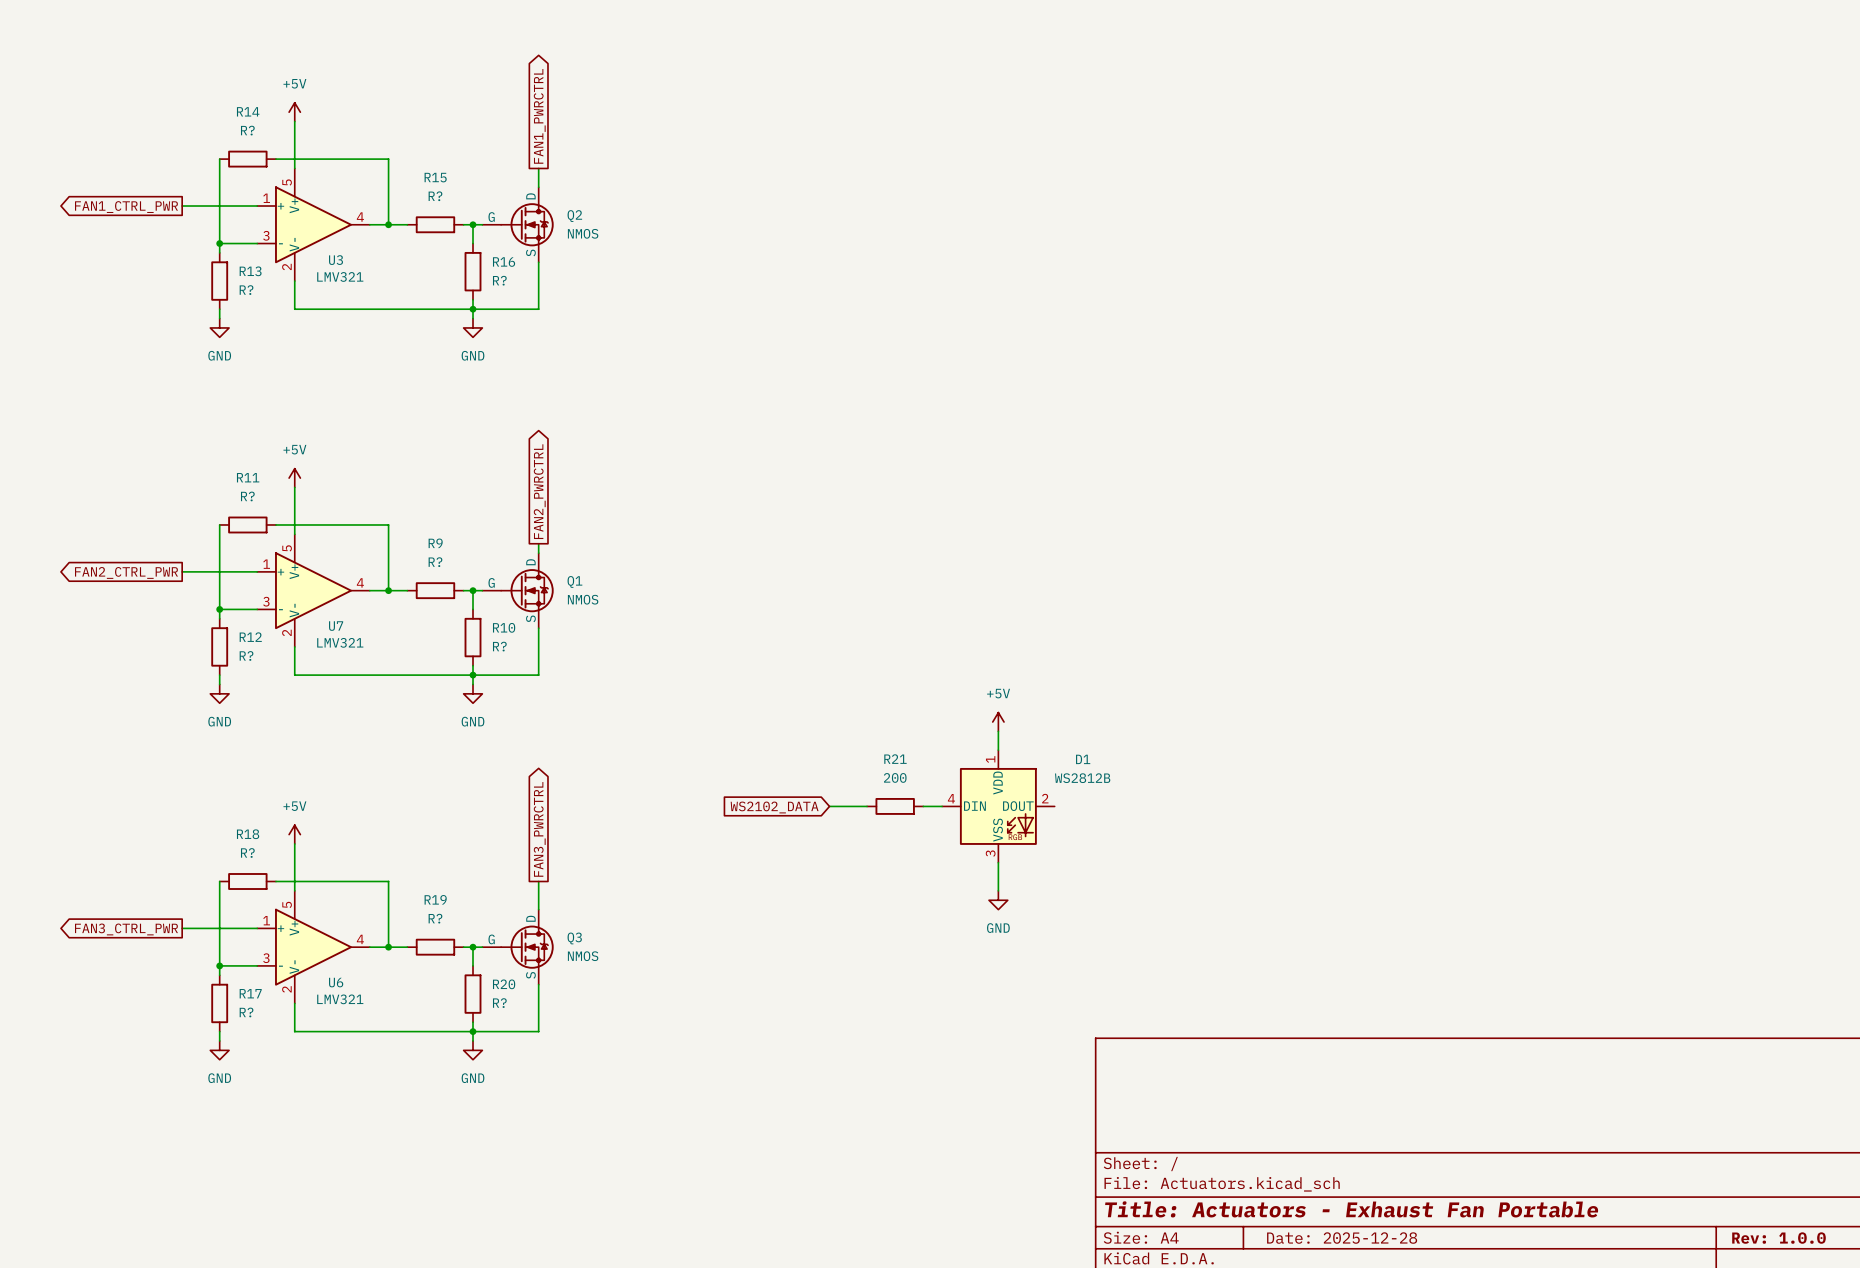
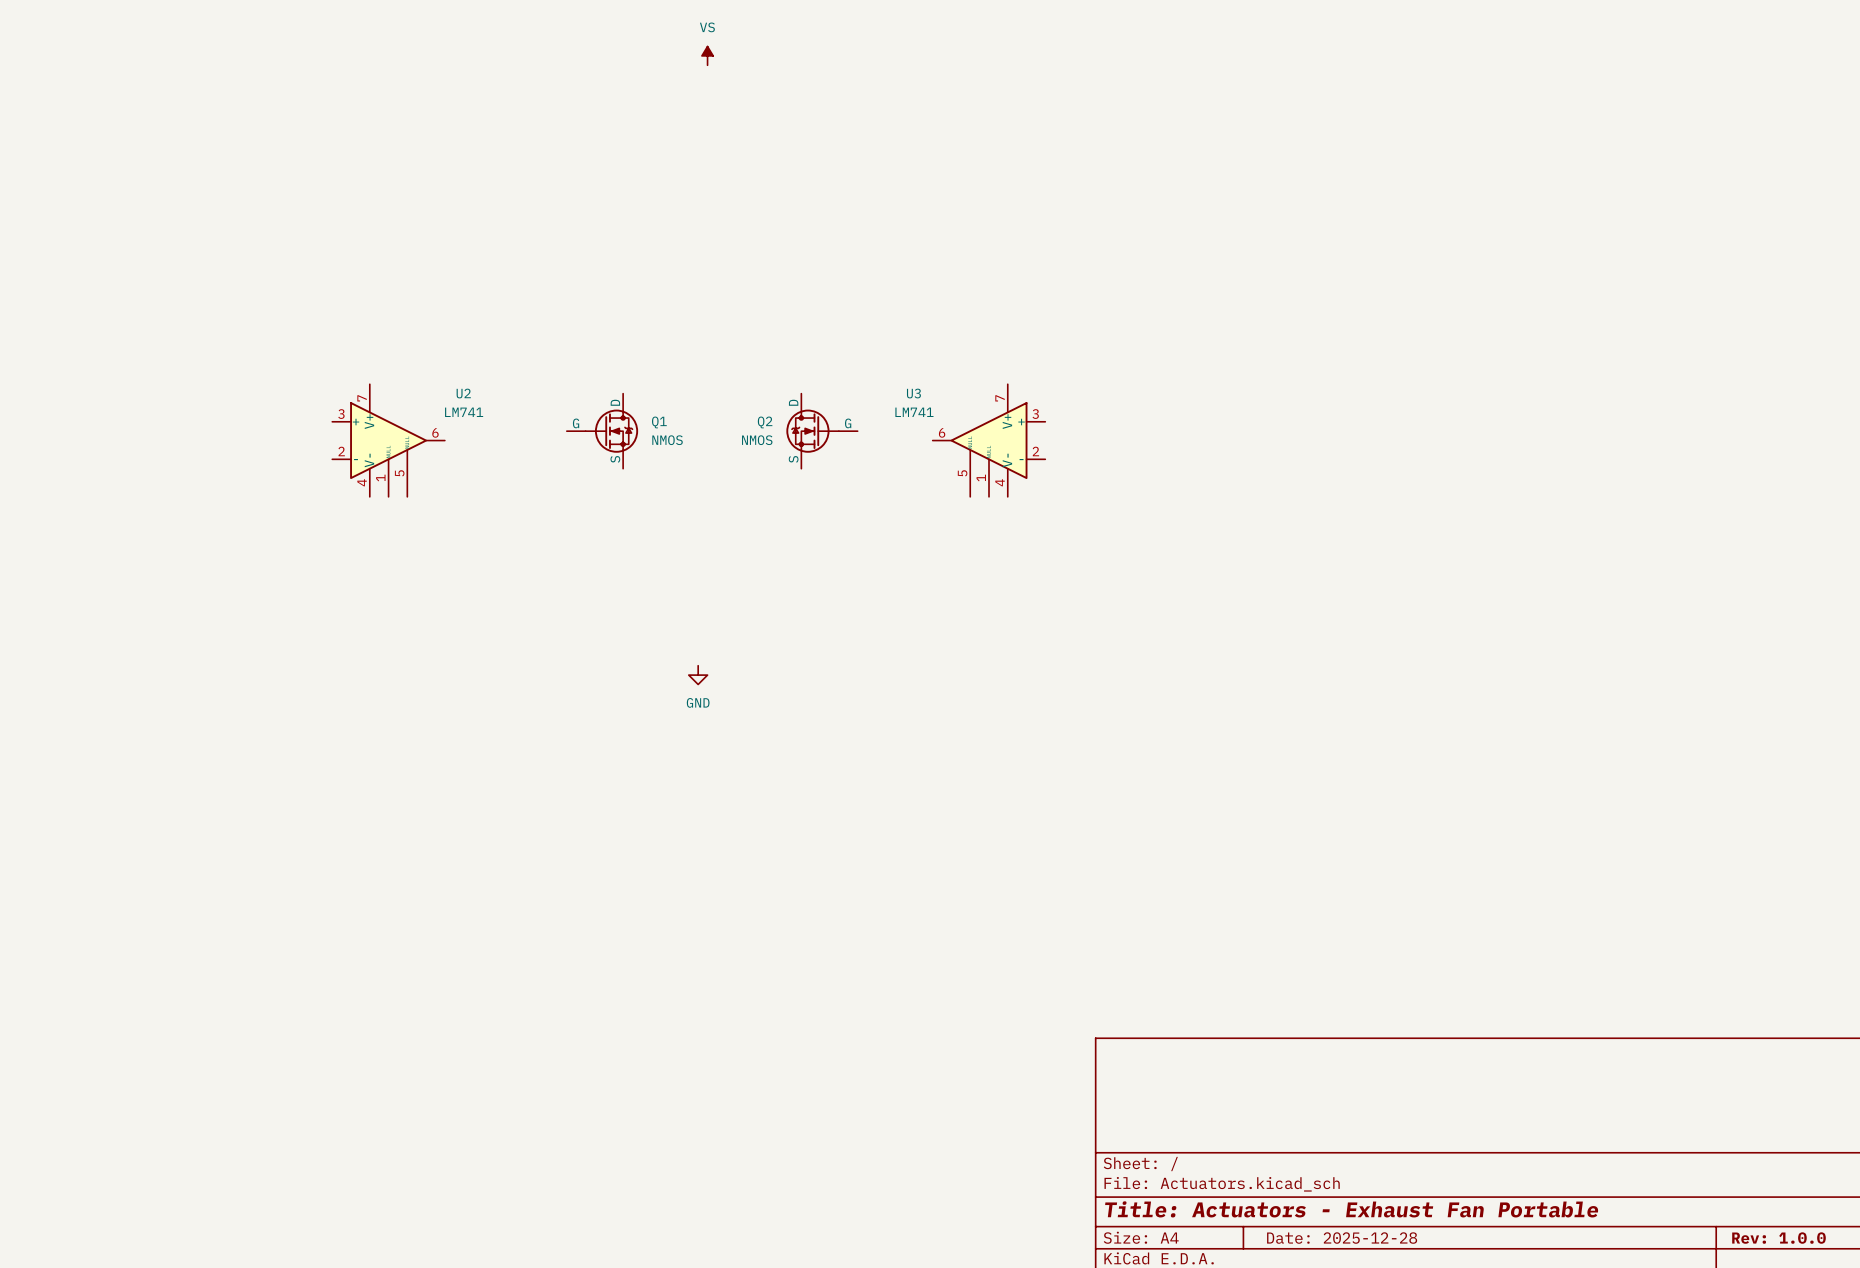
power symbol: none -> VS (707, 55)
power symbol: +5V (294, 112) -> none
global label: FAN1_PWRCTRL (539, 116) -> none
wire: (294, 121) (294, 168) -> none
wire: (219, 159) (219, 252) -> none
R14: R? (247, 159) -> none
wire: (275, 159) (388, 159) (388, 224) -> none
U3 symbol: [257, 168, 370, 282] -> [932, 384, 1046, 497]
wire: (538, 168) (538, 187) -> none
wire: (182, 206) (257, 206) -> none
global label: FAN1_CTRL_PWR (126, 207) -> none
wire: (369, 224) (407, 224) -> none
junction: (388, 224) -> none
R15: R? (435, 224) -> none
wire: (463, 224) (482, 224) -> none
wire: (473, 224) (473, 243) -> none
junction: (473, 224) -> none
Q2 position: (518, 224) -> (822, 431)
Q2 flip: as is (527, 224) -> left-right (812, 431)
wire: (219, 243) (257, 243) -> none
junction: (219, 243) -> none
U3 name position: U3 (336, 260) -> U3 (913, 393)
wire: (538, 262) (538, 309) (294, 309) (294, 281) -> none
R16: R? (473, 271) -> none
U3 value: LMV321 (340, 276) -> LM741 (914, 412)
R13: R? (219, 281) -> none
wire: (473, 299) (473, 318) -> none
wire: (219, 309) (219, 318) -> none
junction: (473, 309) -> none
power symbol: GND (219, 327) -> none
power symbol: GND (473, 327) -> none
U2: none -> LM741 (388, 440)
power symbol: +5V (294, 478) -> none
wire: (294, 487) (294, 534) -> none
global label: FAN2_PWRCTRL (539, 491) -> none
wire: (219, 524) (219, 618) -> none
R11: R? (247, 524) -> none
wire: (275, 524) (388, 524) (388, 590) -> none
wire: (538, 543) (538, 553) -> none
wire: (182, 571) (257, 571) -> none
global label: FAN2_CTRL_PWR (126, 572) -> none
U7: LMV321 (313, 590) -> none
wire: (369, 590) (407, 590) -> none
junction: (388, 590) -> none
R9: R? (435, 590) -> none
wire: (463, 590) (482, 590) -> none
wire: (473, 590) (473, 609) -> none
junction: (473, 590) -> none
Q1 position: (518, 590) -> (602, 431)
wire: (219, 609) (257, 609) -> none
junction: (219, 609) -> none
wire: (538, 628) (538, 675) (294, 675) (294, 646) -> none
R10: R? (473, 637) -> none
R12: R? (219, 646) -> none
wire: (473, 665) (473, 684) -> none
wire: (219, 675) (219, 684) -> none
junction: (473, 675) -> none
power symbol: none -> GND (698, 675)
power symbol: GND (219, 693) -> none
power symbol: GND (473, 693) -> none
power symbol: +5V (998, 722) -> none
wire: (998, 731) (998, 750) -> none
wire: (829, 806) (867, 806) -> none
R21: 200 (895, 806) -> none
wire: (923, 806) (942, 806) -> none
D1: WS2812B (998, 806) -> none
global label: WS2102_DATA (774, 807) -> none
global label: FAN3_PWRCTRL (539, 829) -> none
power symbol: +5V (294, 834) -> none
wire: (294, 843) (294, 890) -> none
wire: (998, 862) (998, 890) -> none
wire: (219, 881) (219, 975) -> none
R18: R? (247, 881) -> none
wire: (275, 881) (388, 881) (388, 947) -> none
wire: (538, 881) (538, 909) -> none
power symbol: GND (998, 900) -> none
wire: (182, 928) (257, 928) -> none
global label: FAN3_CTRL_PWR (126, 929) -> none
U6: LMV321 (313, 947) -> none
wire: (369, 947) (407, 947) -> none
junction: (388, 947) -> none
R19: R? (435, 947) -> none
wire: (463, 947) (482, 947) -> none
wire: (473, 947) (473, 965) -> none
junction: (473, 947) -> none
Q3: NMOS (518, 947) -> none
wire: (219, 965) (257, 965) -> none
junction: (219, 965) -> none
wire: (538, 984) (538, 1031) (294, 1031) (294, 1003) -> none
R20: R? (473, 994) -> none
R17: R? (219, 1003) -> none
wire: (473, 1022) (473, 1040) -> none
wire: (219, 1031) (219, 1040) -> none
junction: (473, 1031) -> none
power symbol: GND (219, 1050) -> none
power symbol: GND (473, 1050) -> none

